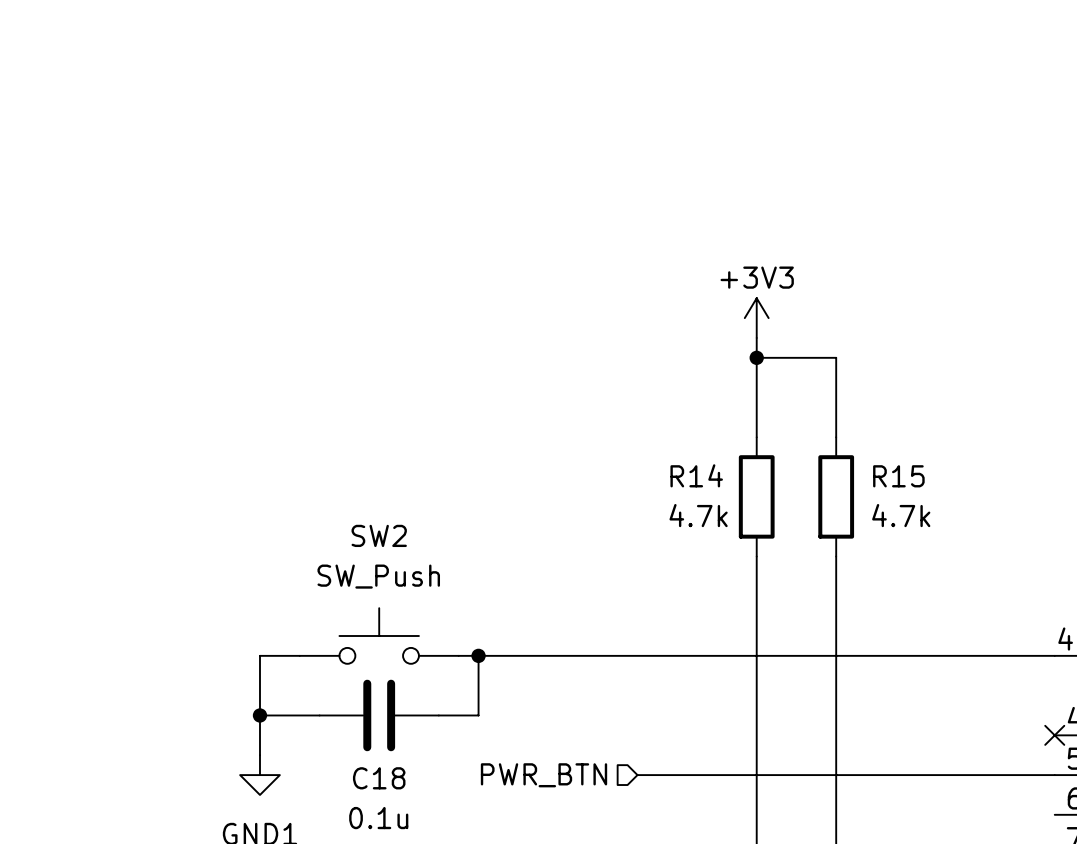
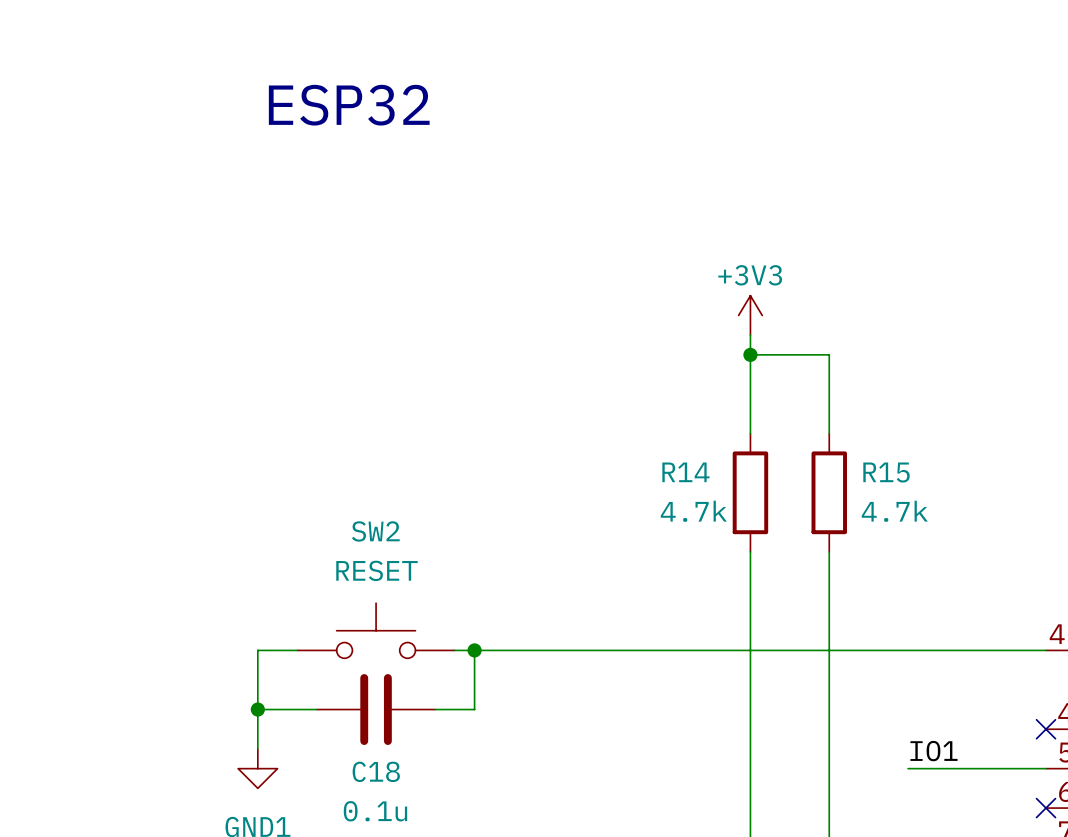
text: none -> ESP32 (349, 105)
SW2 value: SW_Push (378, 576) -> RESET (376, 570)
label: none -> IO1 (934, 751)
hierarchical label: PWR_BTN (544, 775) -> none
wire: (637, 775) (915, 775) -> none
no-connect mark: none -> (1046, 808)

